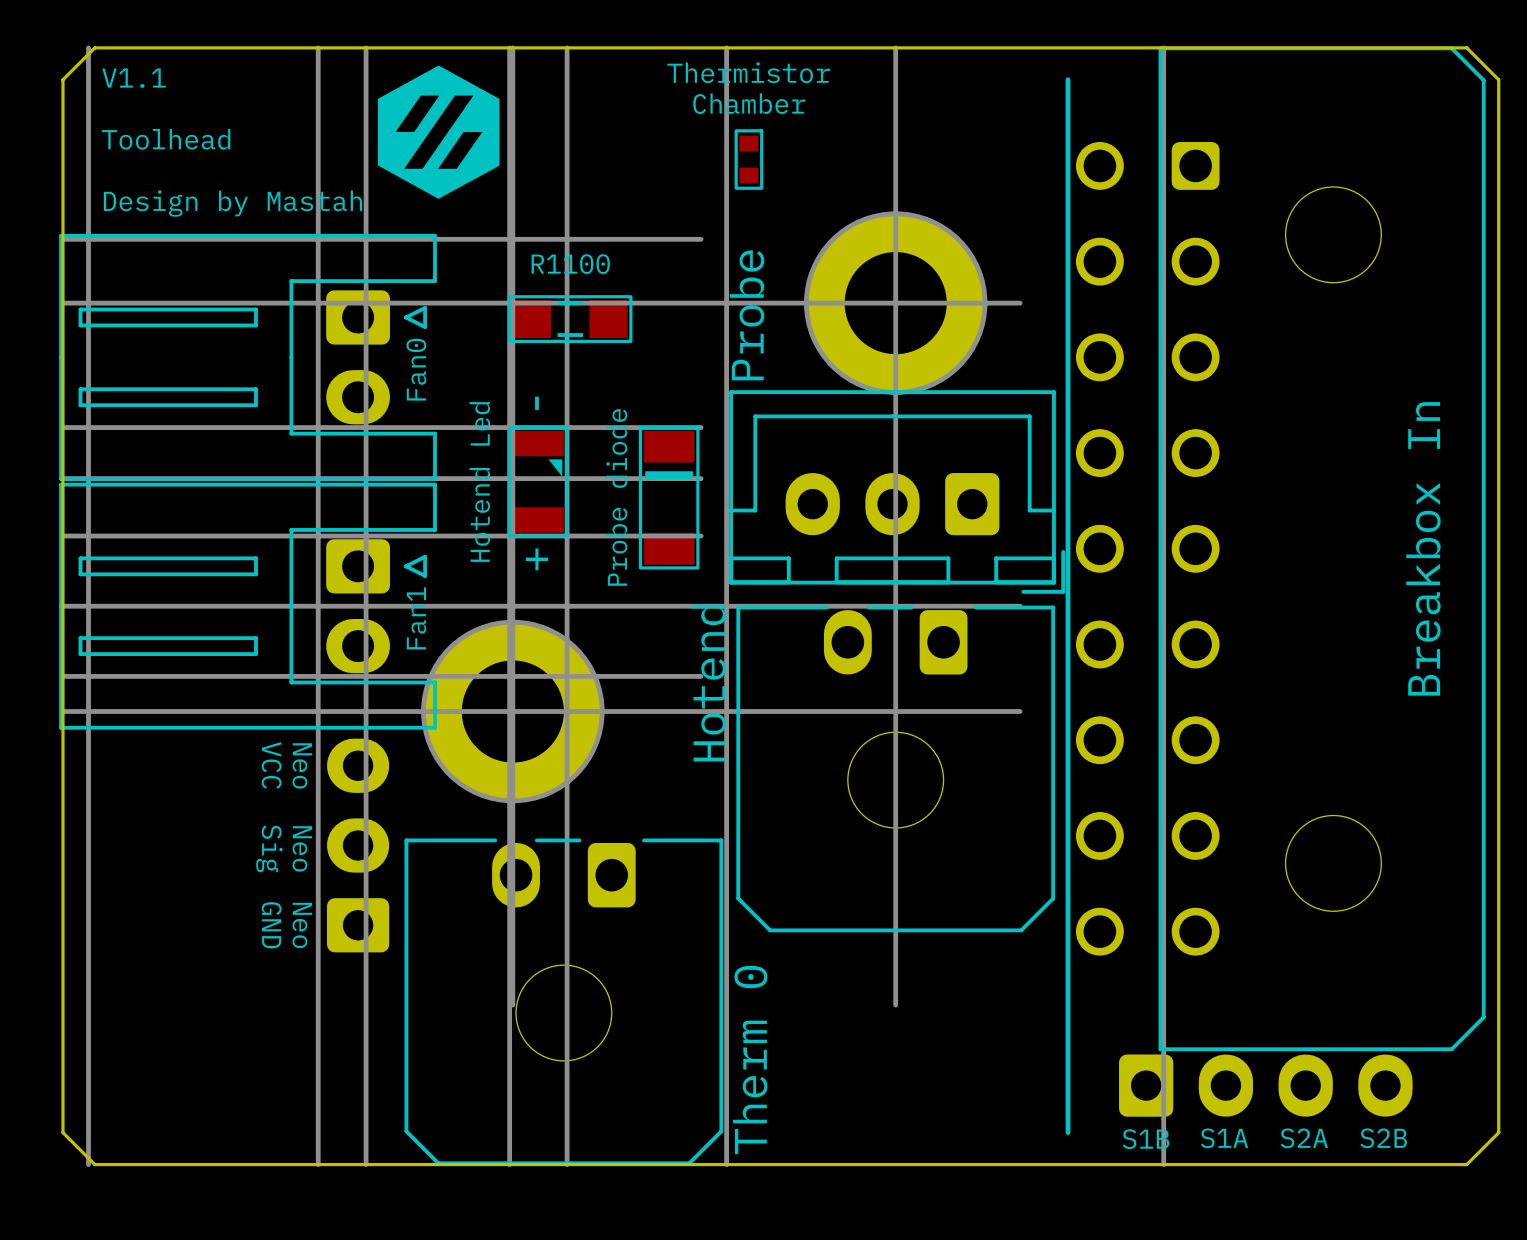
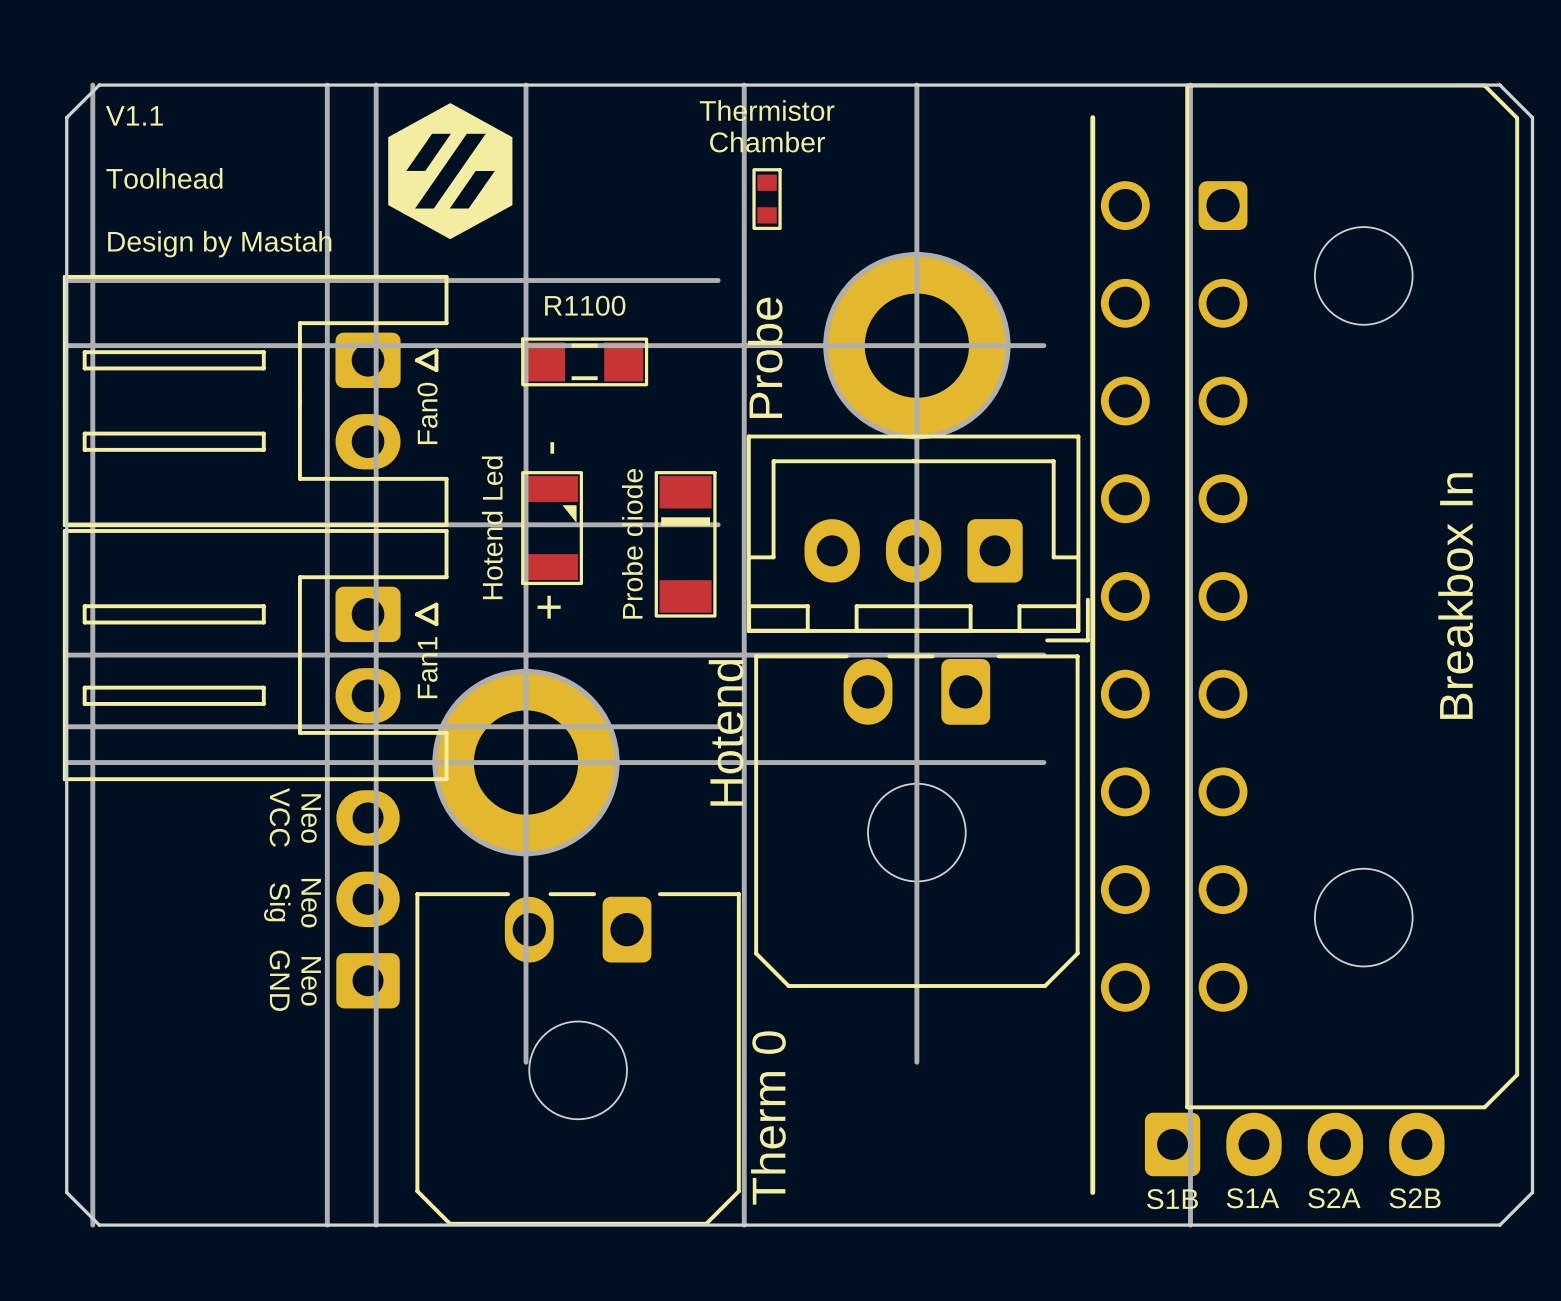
line: (509, 47) (509, 1164) -> none
line: (567, 47) (567, 1164) -> none
line: (62, 427) (701, 427) -> none
line: (62, 536) (701, 536) -> none

